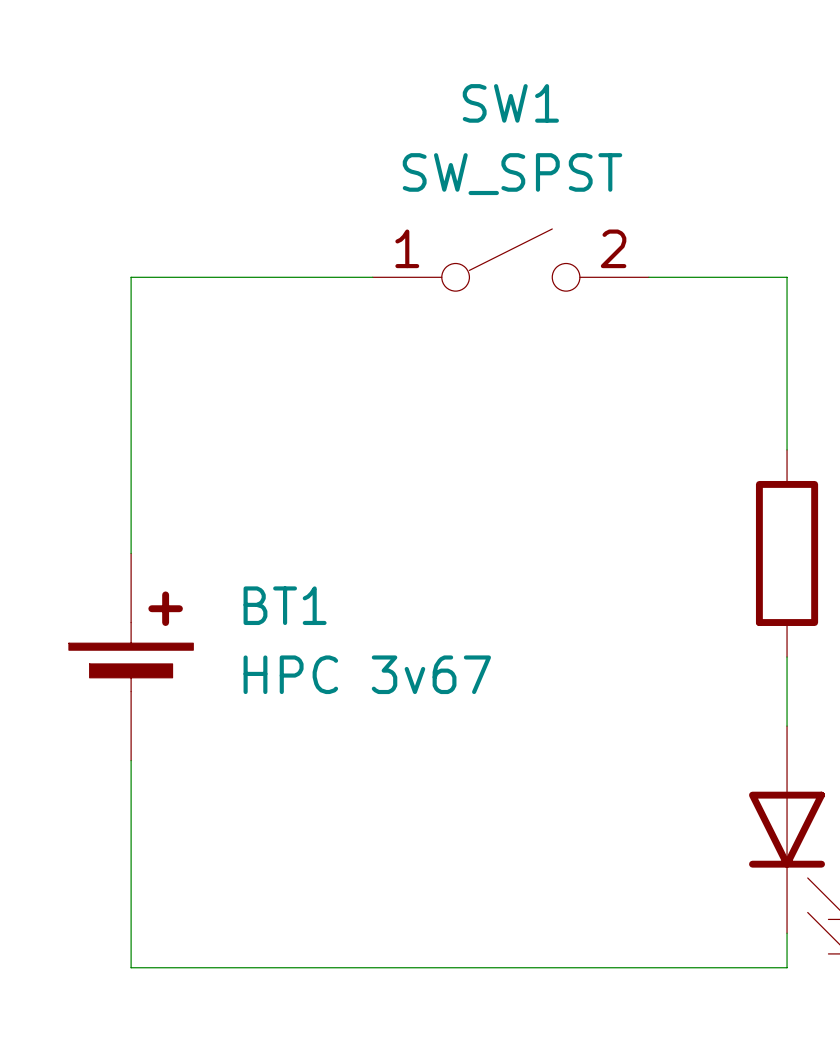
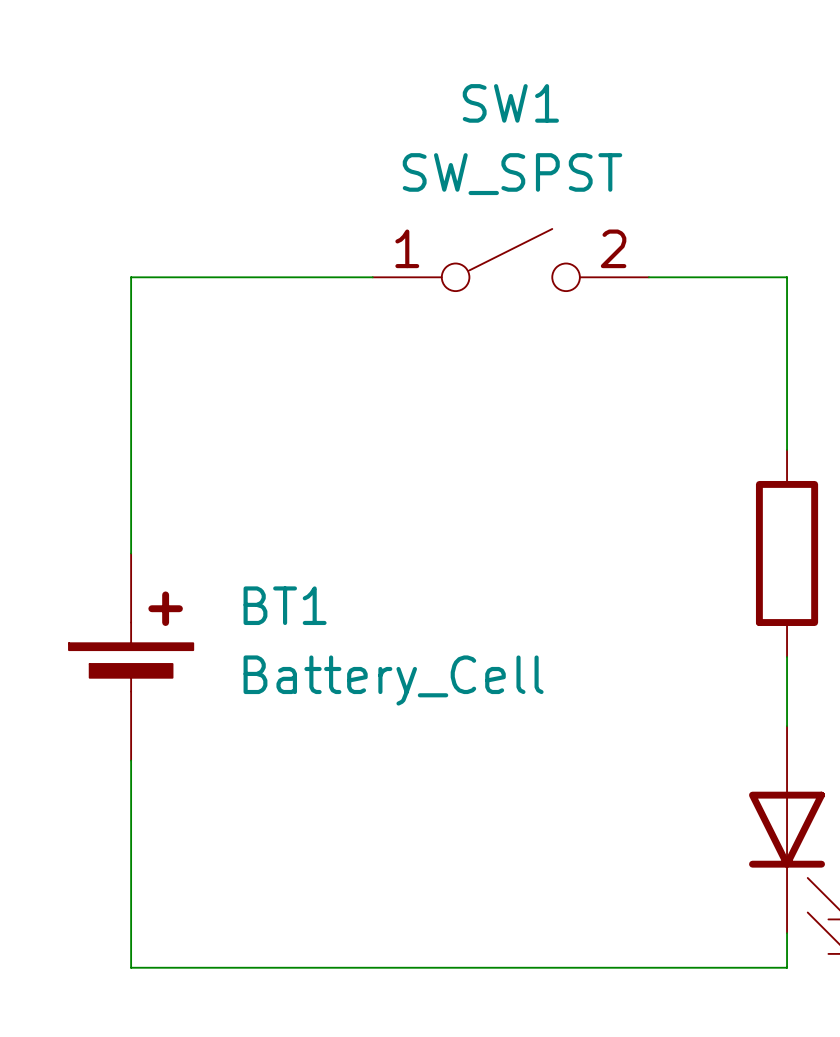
BT1 value: HPC 3v67 (367, 674) -> Battery_Cell (393, 680)

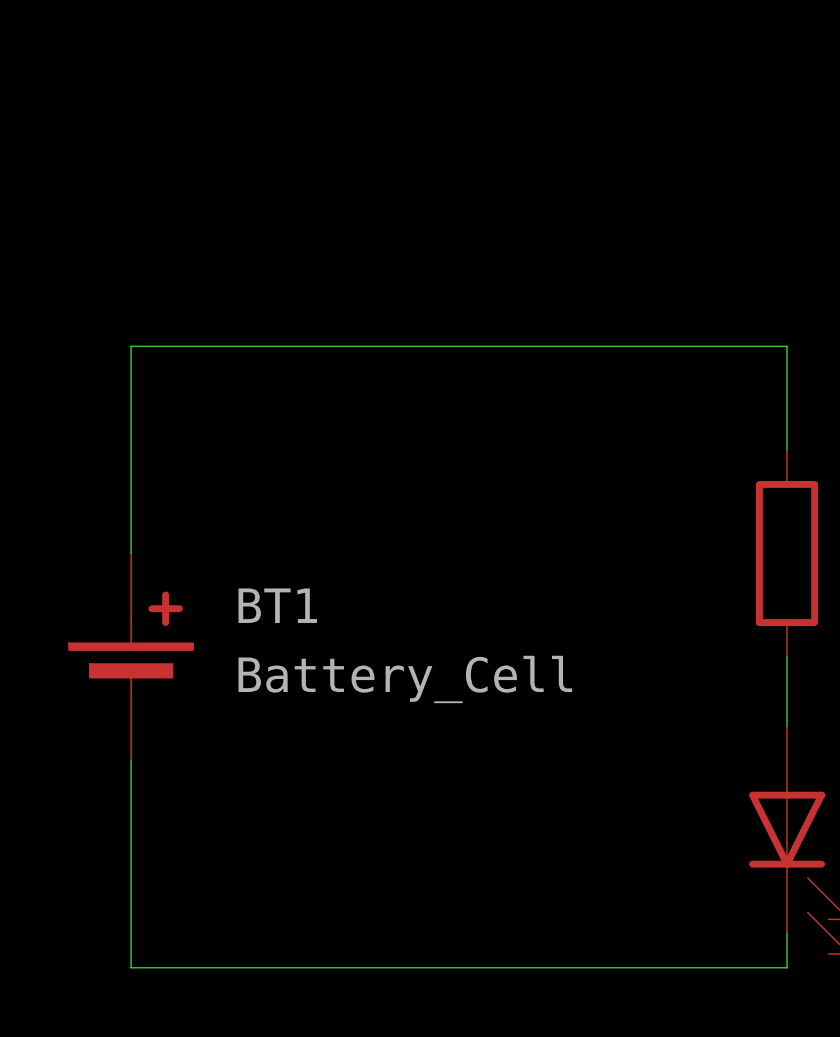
SW1: SW_SPST (510, 260) -> none
wire: (372, 277) (131, 277) (131, 346) -> (787, 346) (131, 346)
wire: (648, 277) (787, 277) (787, 346) -> none

